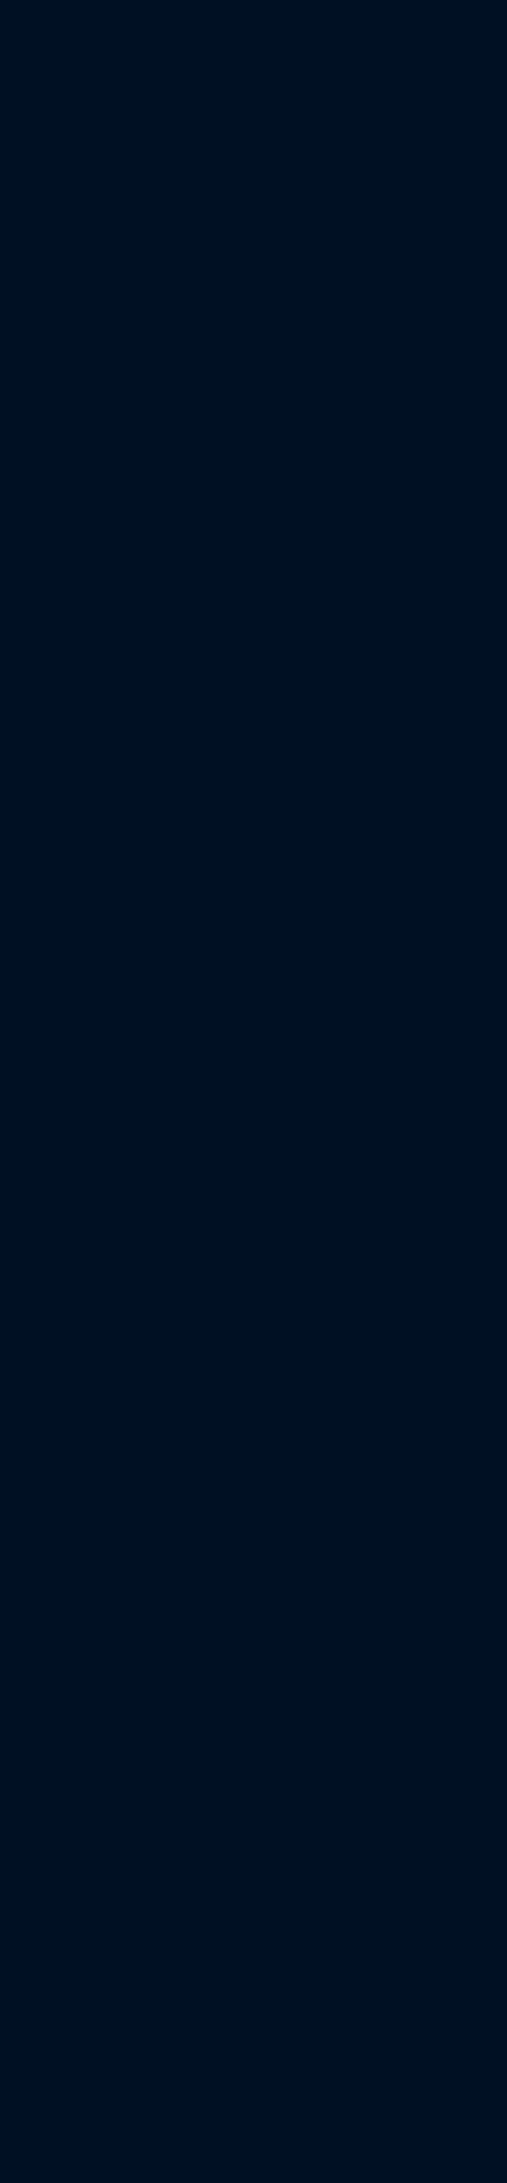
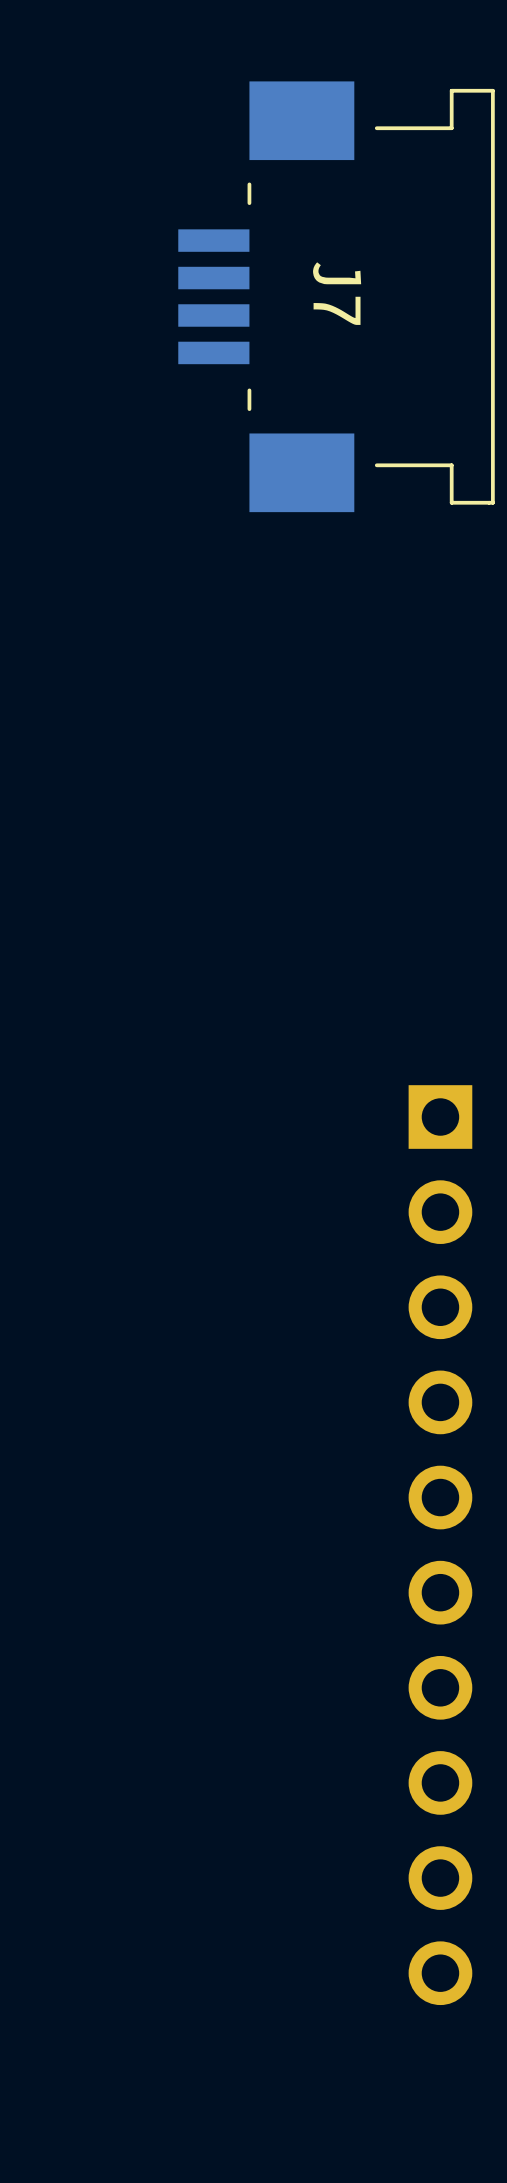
J7: none -> (336, 296)
part: none -> (440, 1545)

